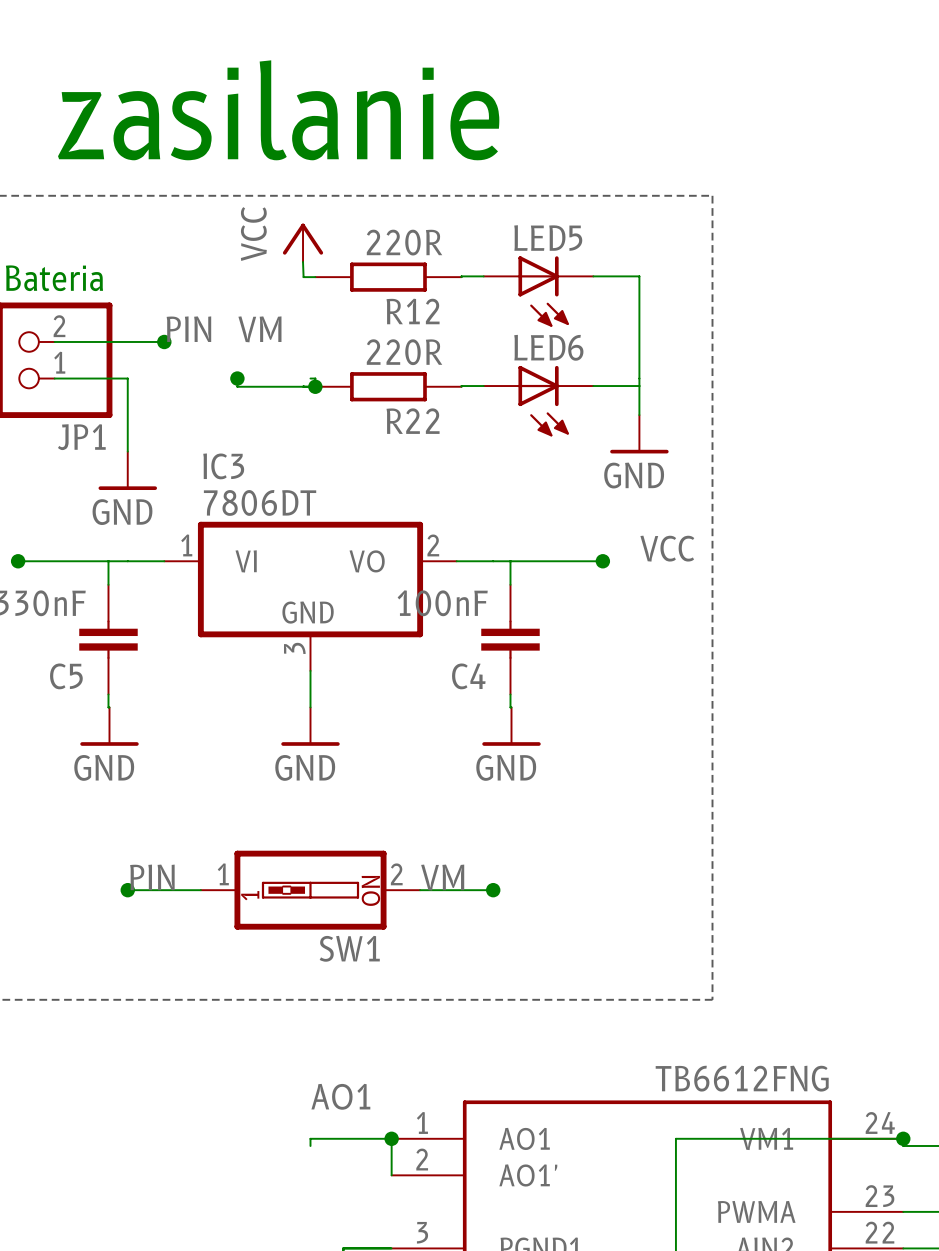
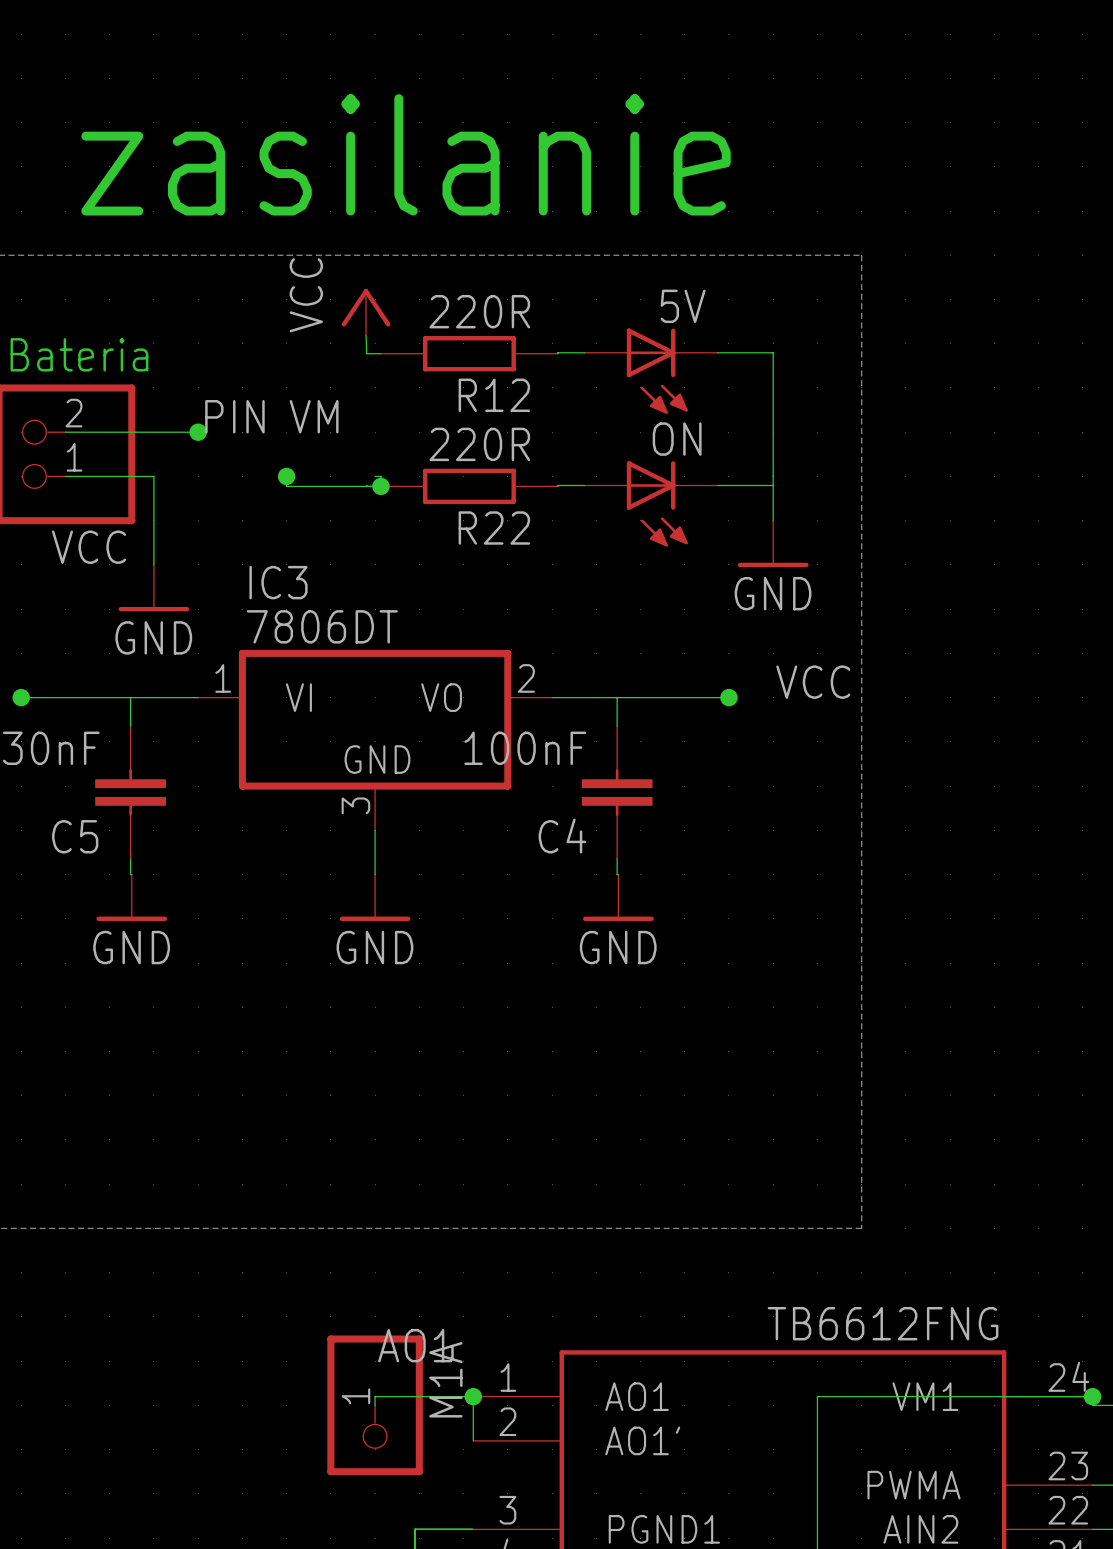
LED5 name: LED5 (548, 238) -> 5V (683, 306)
LED6 name: LED6 (548, 347) -> ON (677, 439)
JP1 name: JP1 (81, 437) -> VCC (89, 547)
label: PIN (152, 877) -> none
label: VM (442, 877) -> none
wire: (127, 890) (200, 890) -> none
junction: (127, 890) -> none
SW1: (310, 890) -> none
wire: (420, 890) (493, 890) -> none
junction: (493, 890) -> none
M1A: none -> (375, 1405)

